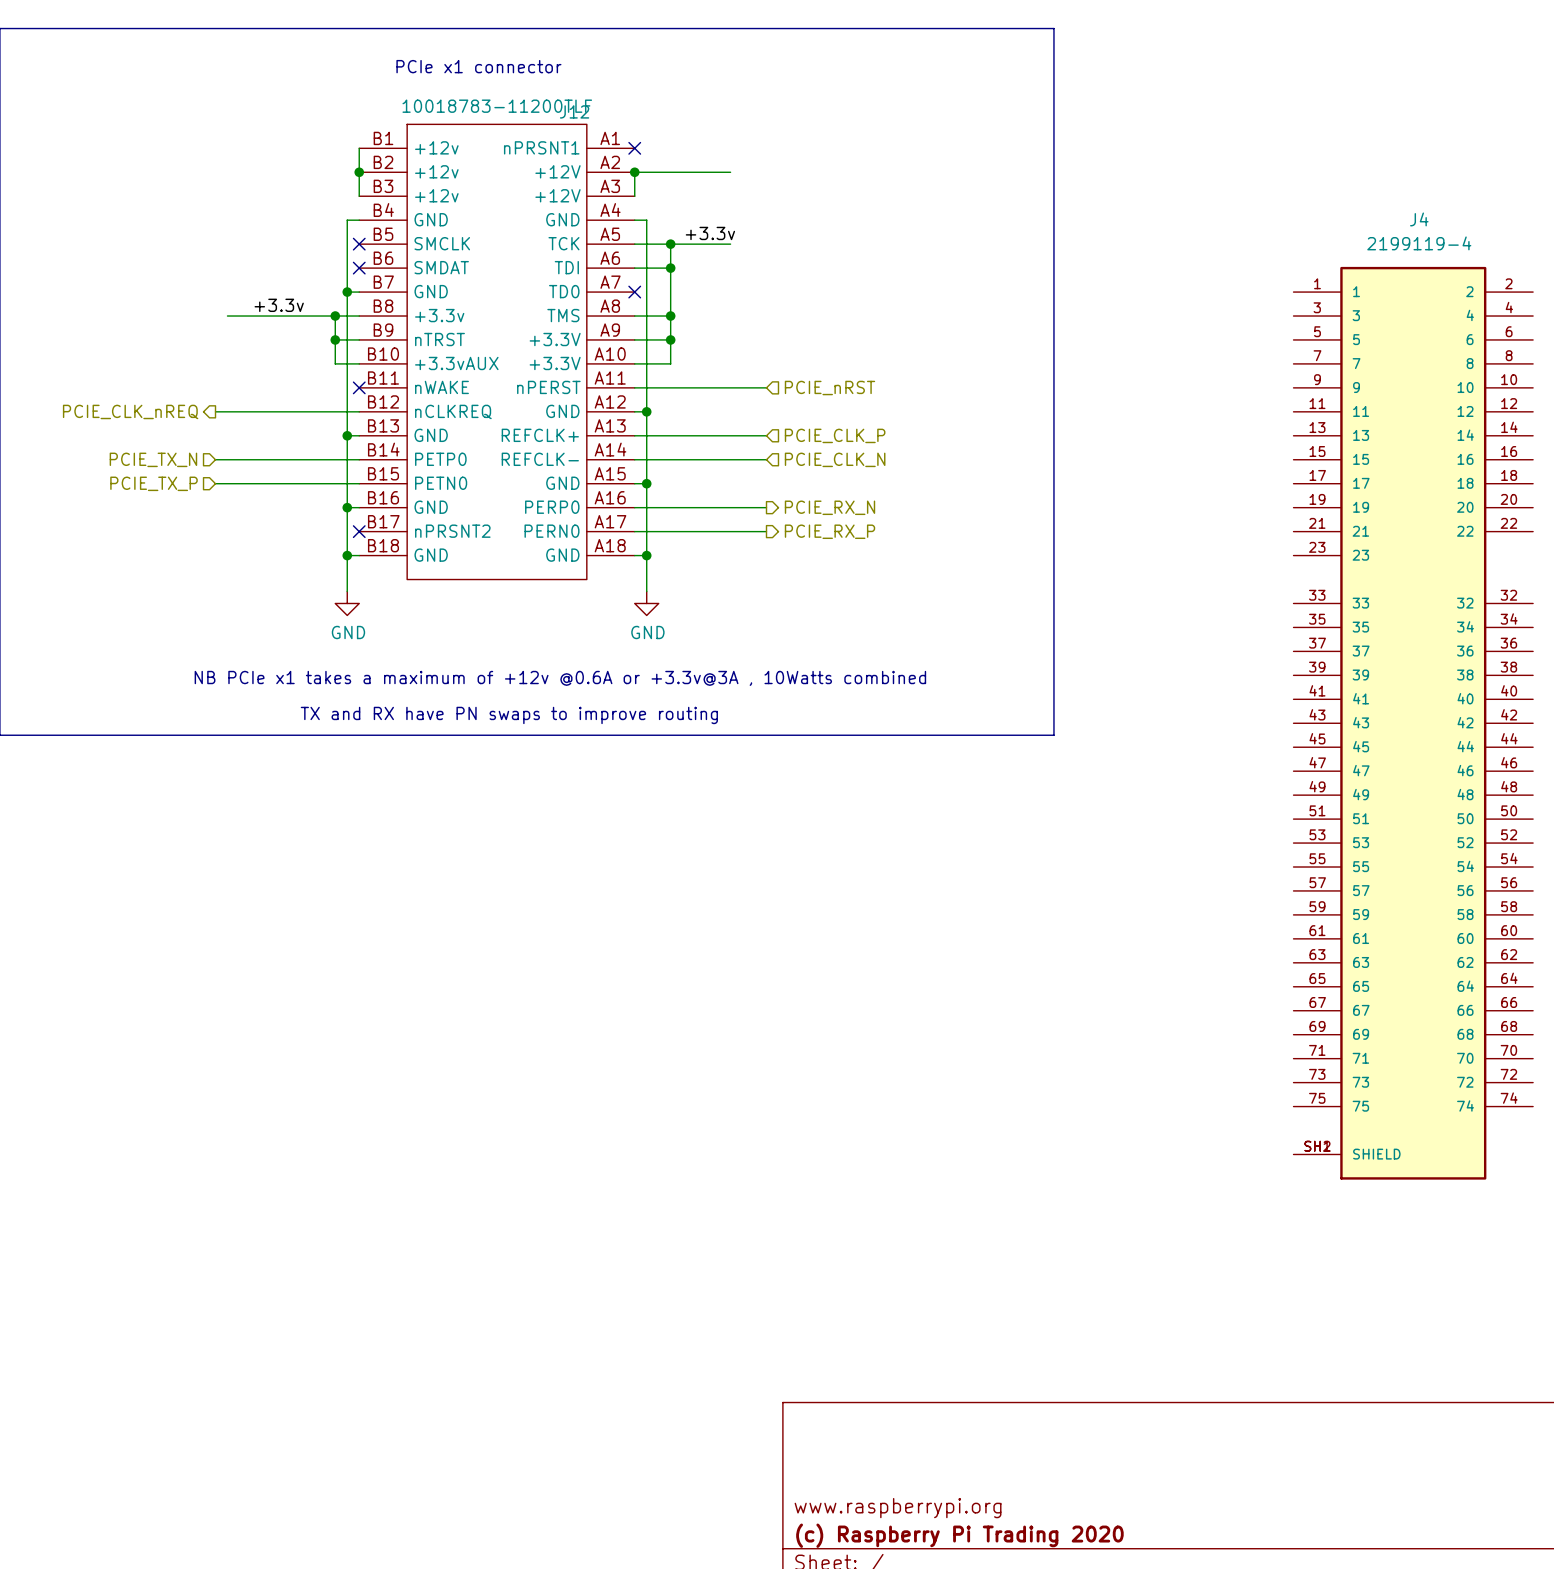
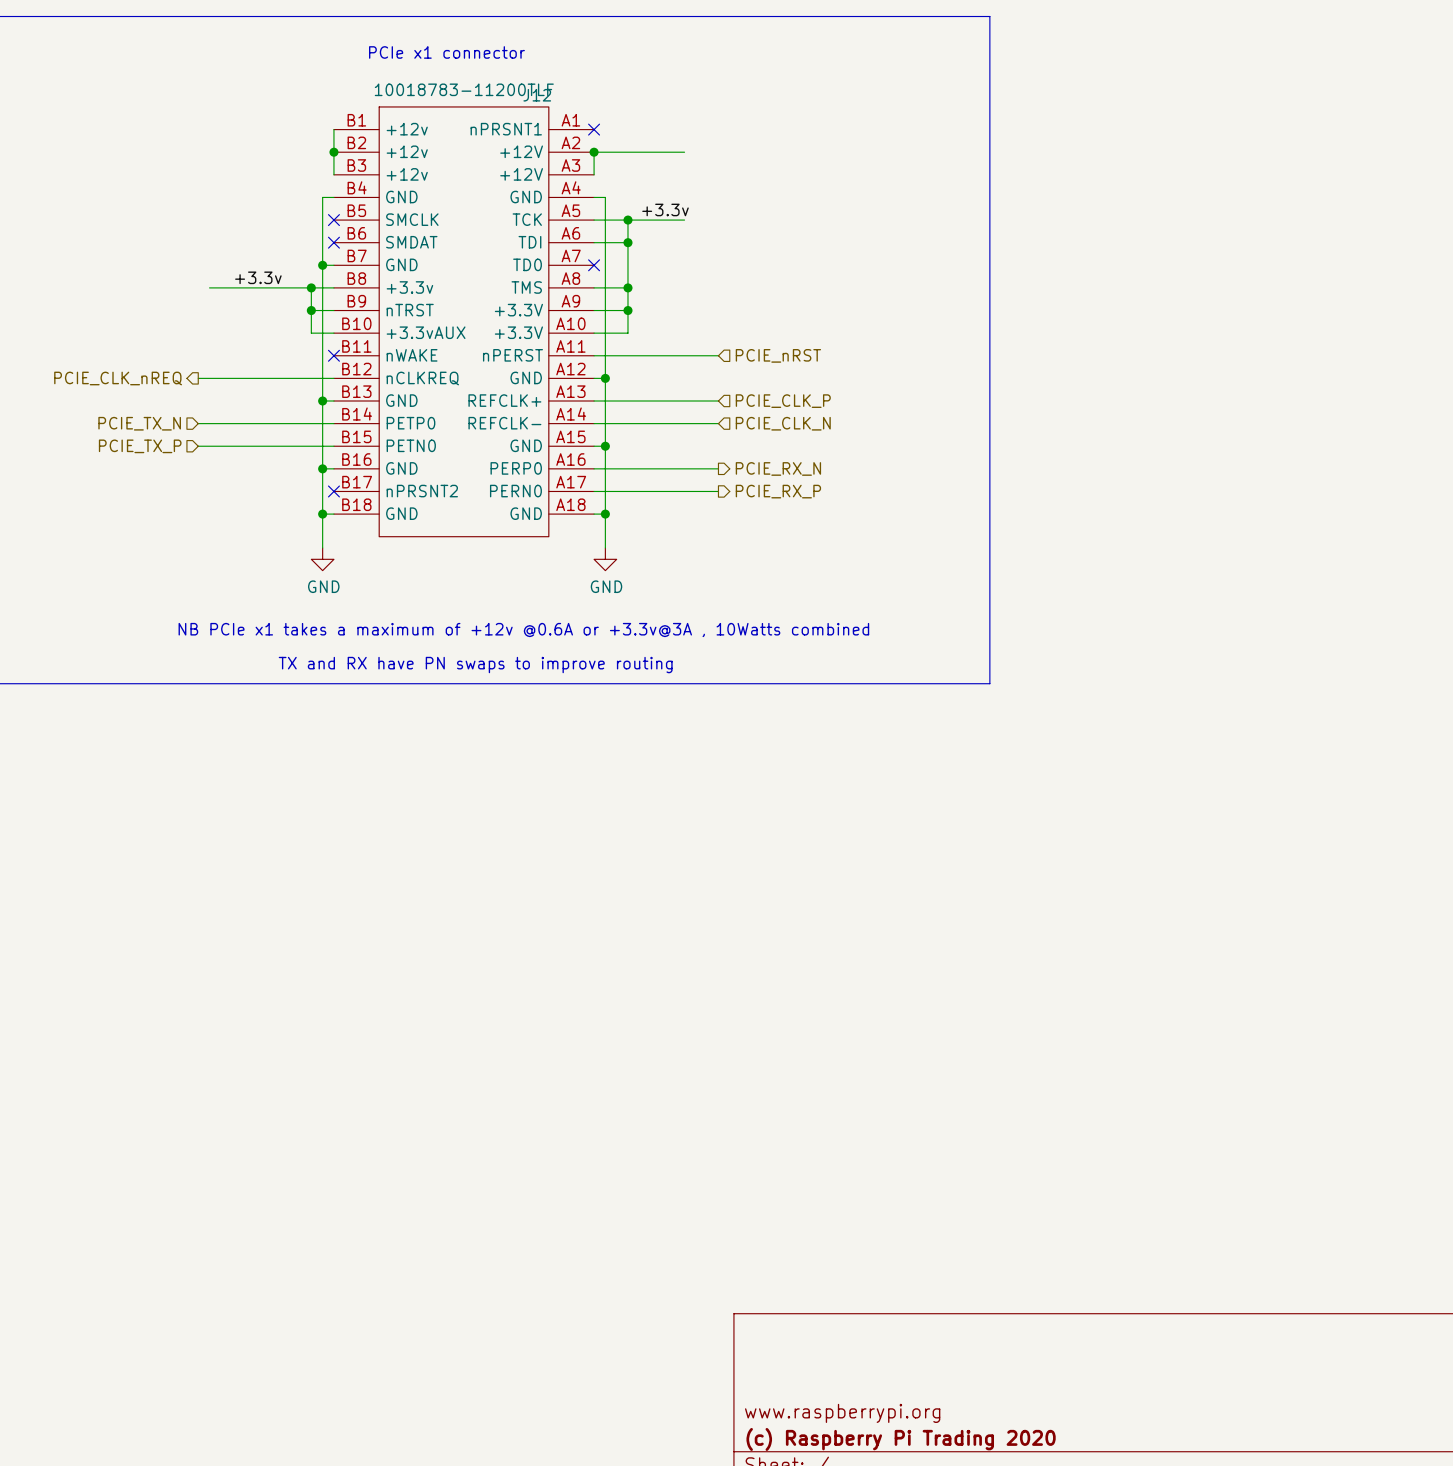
J4: 2199119-4 (1413, 723) -> none

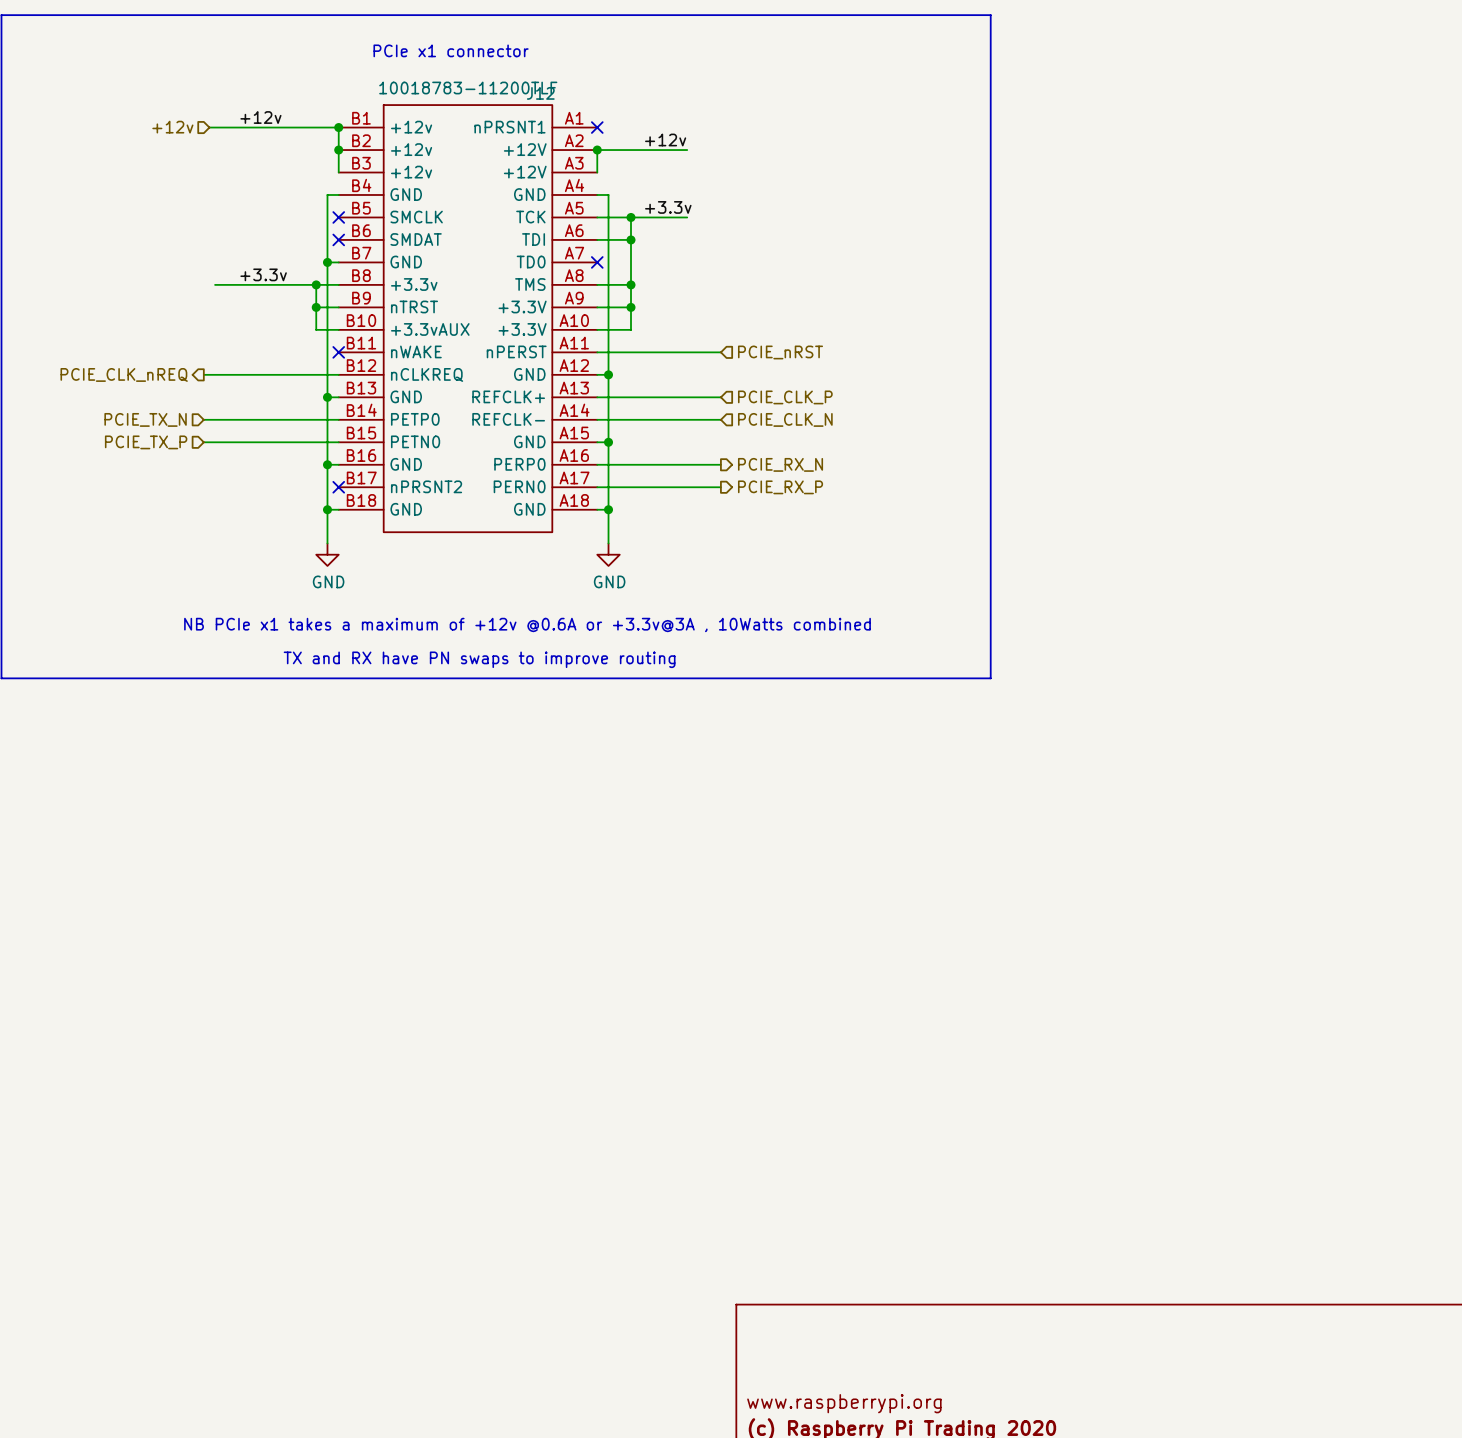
label: none -> +12v (260, 117)
hierarchical label: none -> +12v (172, 127)
wire: none -> (209, 127) (338, 127)
junction: none -> (338, 127)
label: none -> +12v (665, 139)

